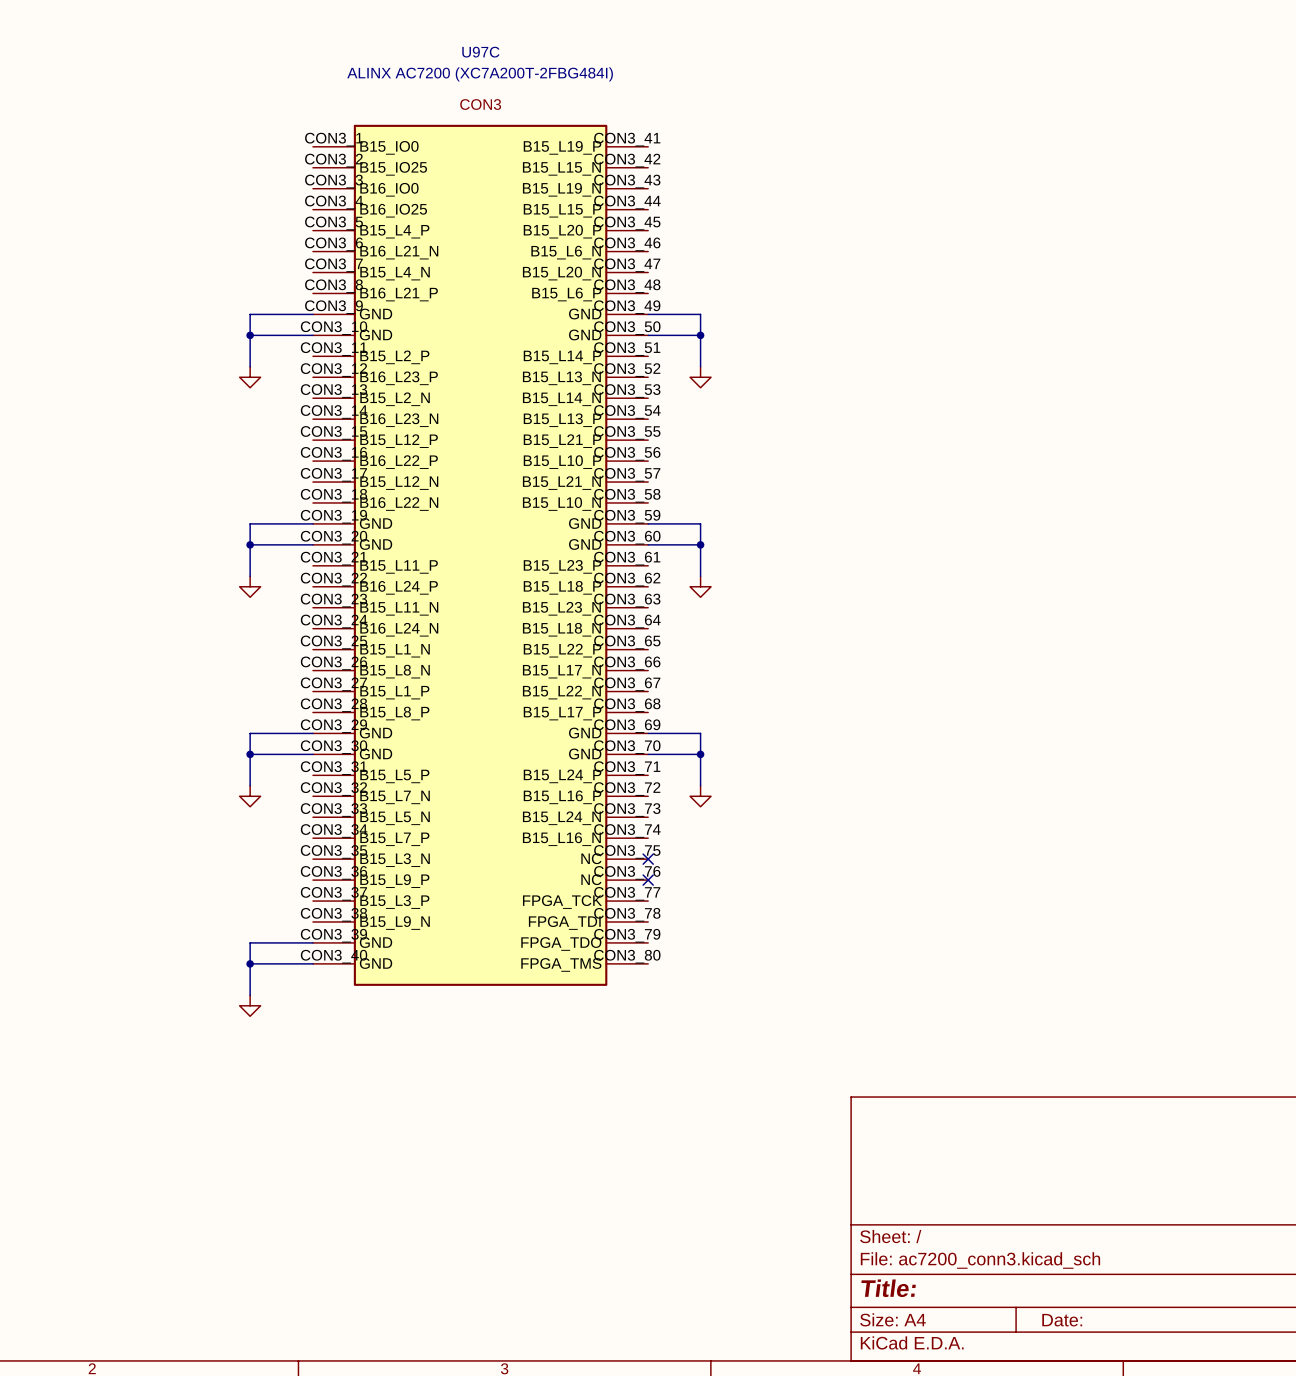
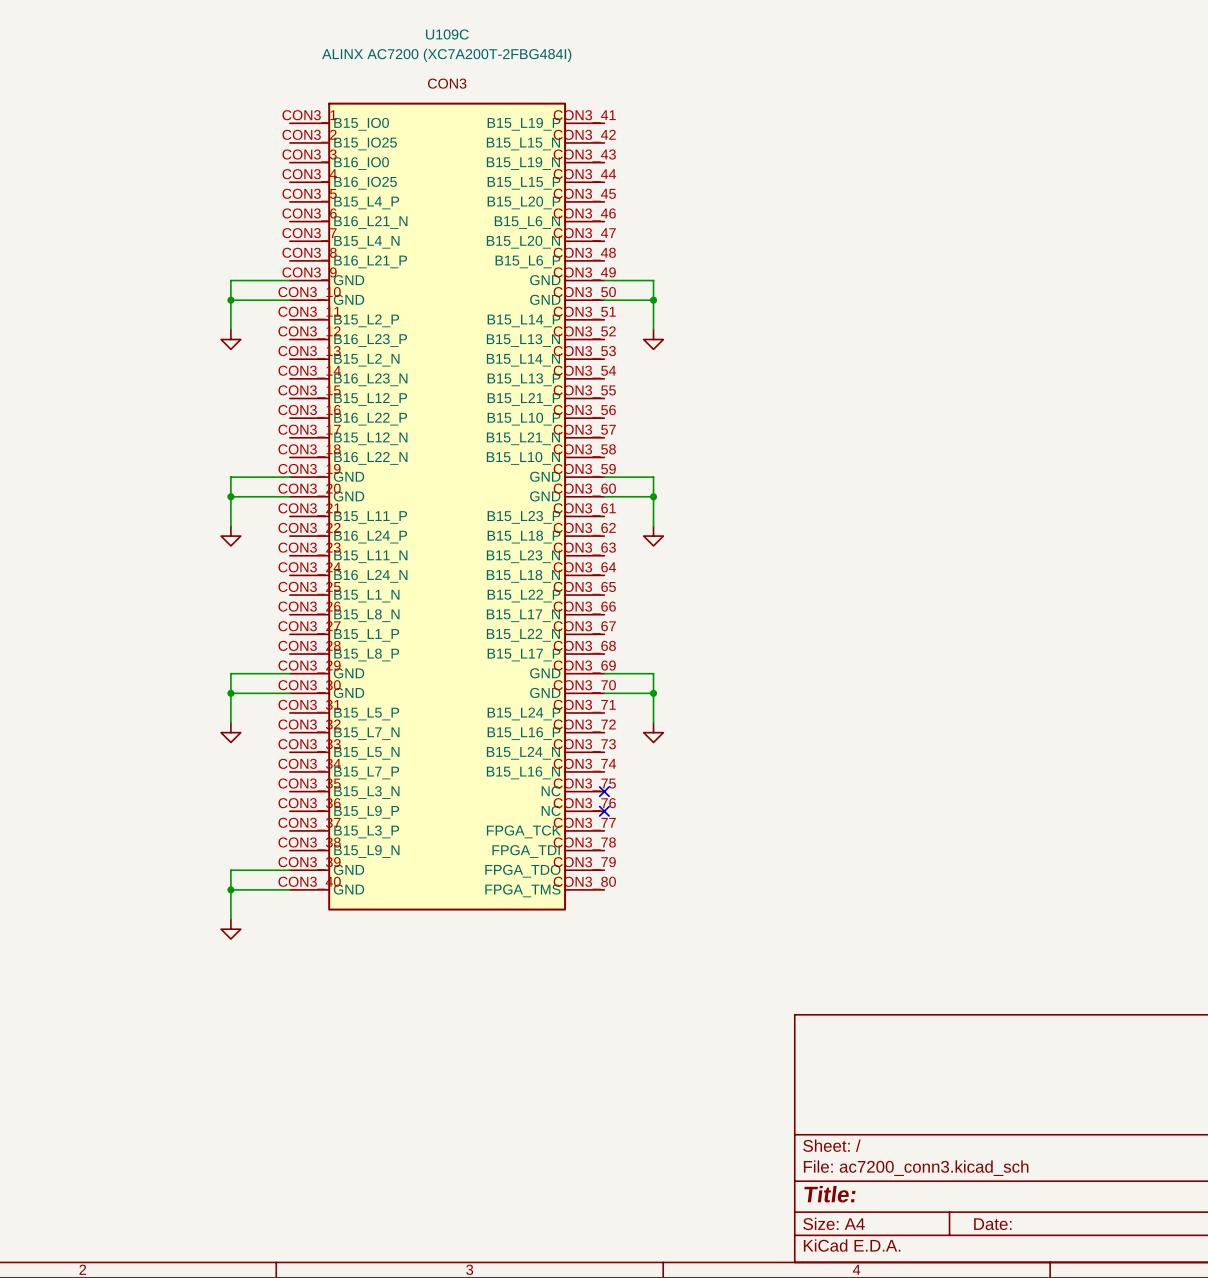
U97C name: U97C (480, 52) -> U109C (447, 34)

